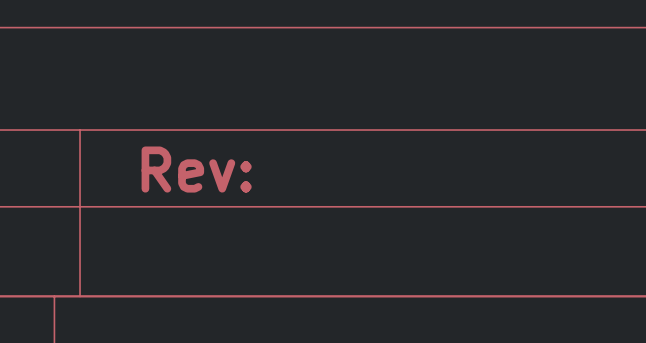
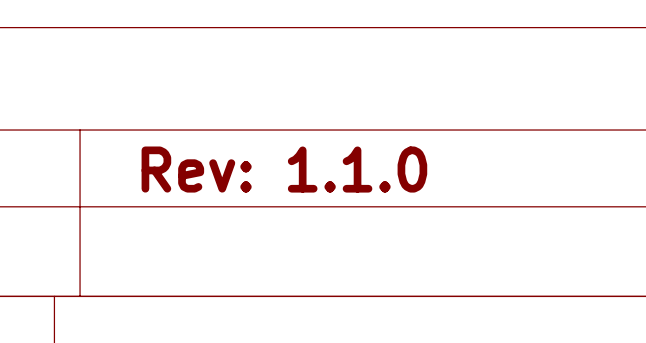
title block: Rev: (196, 169) -> Rev: 1.1.0 (284, 169)

